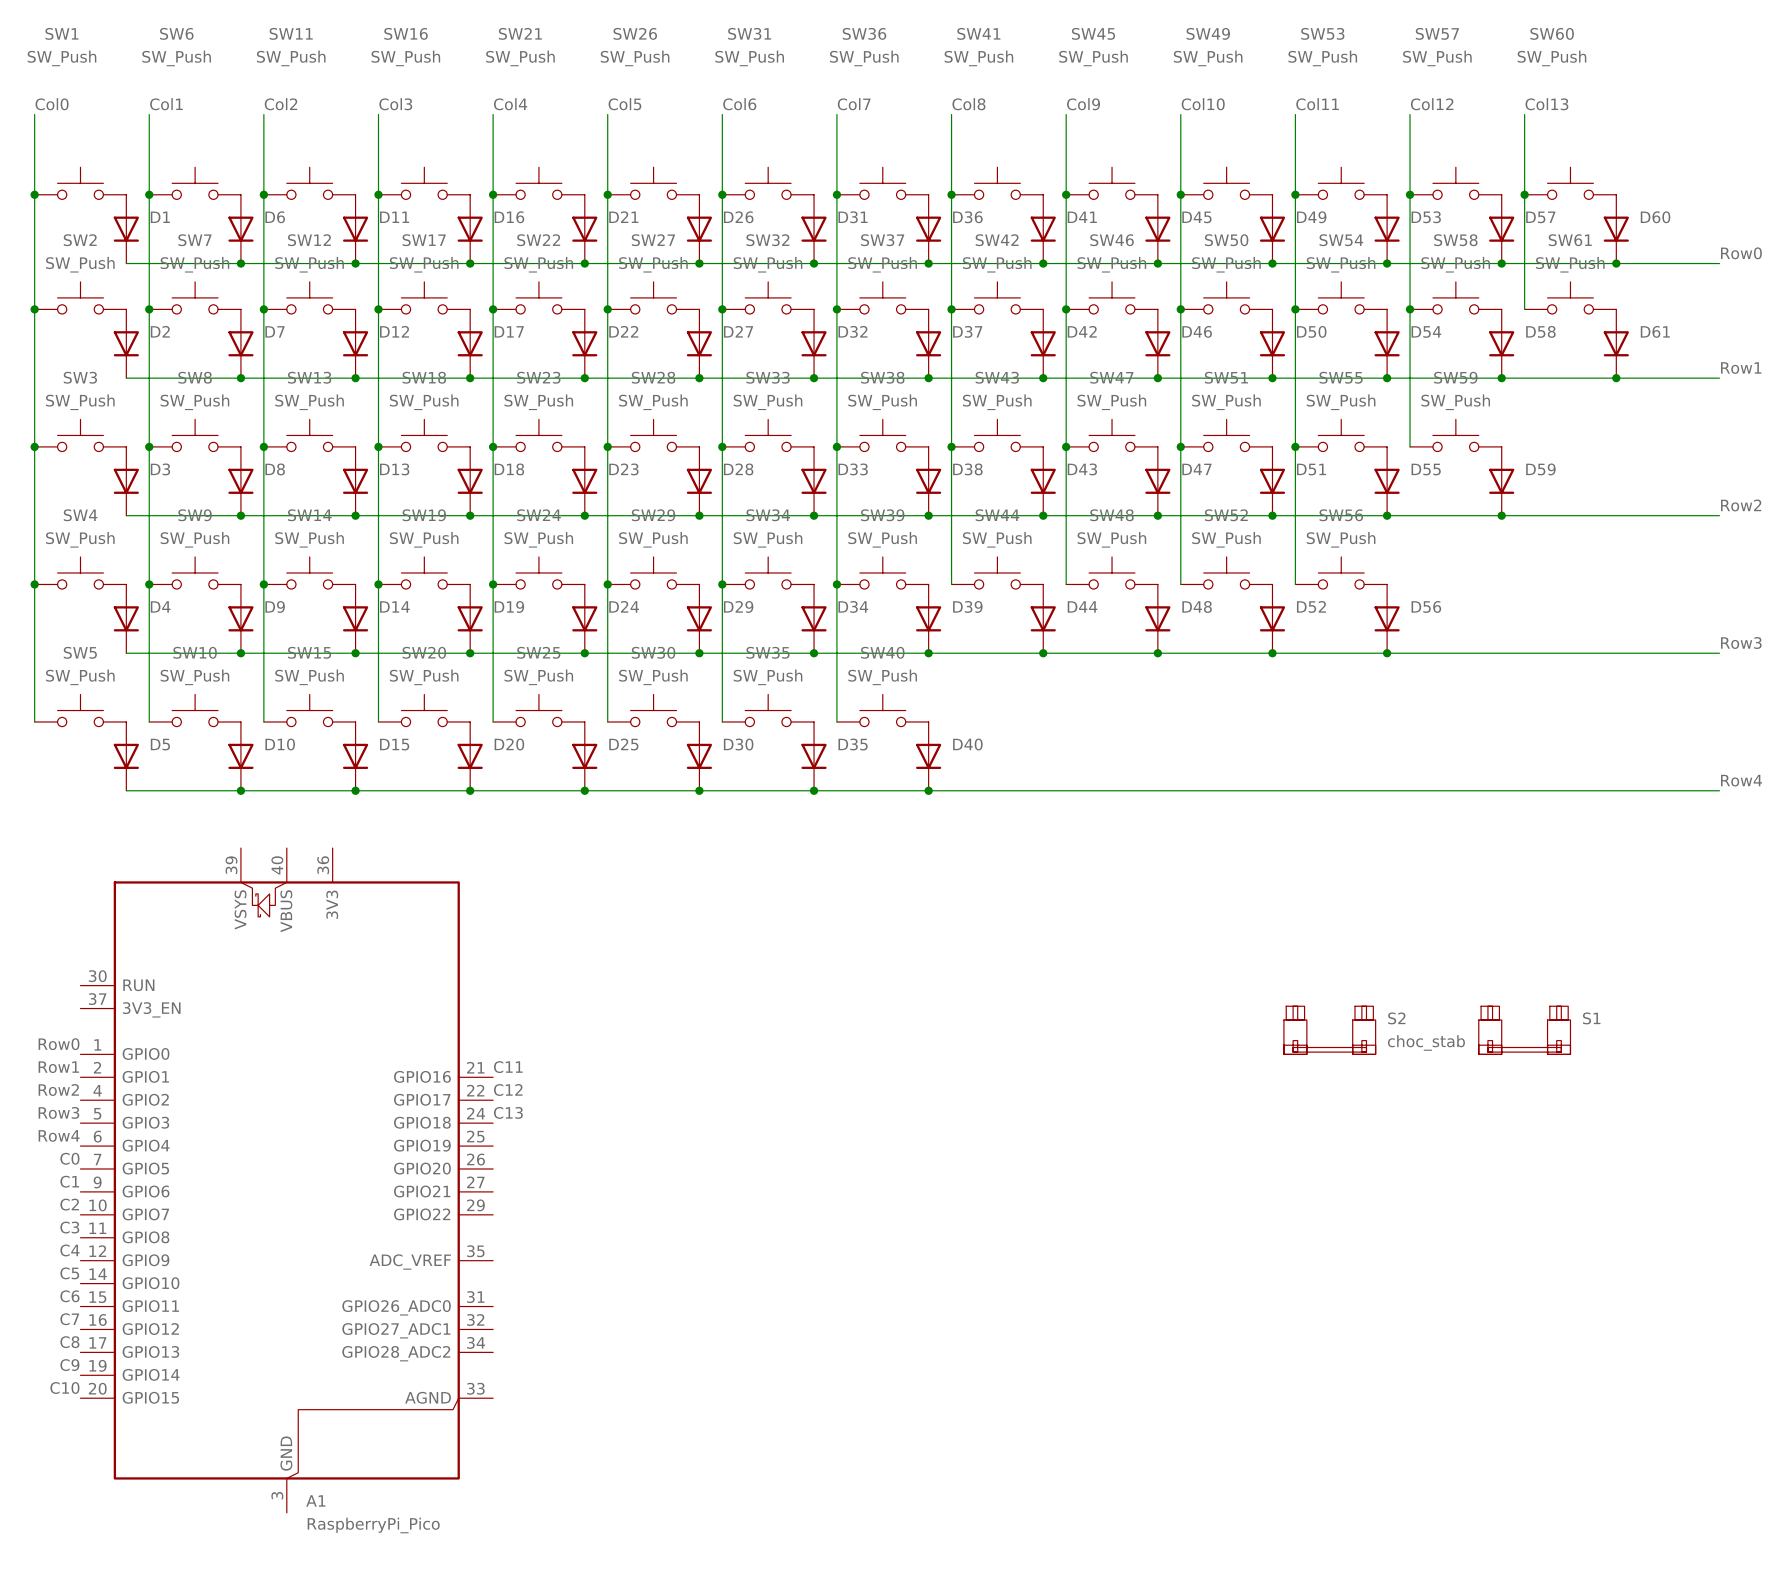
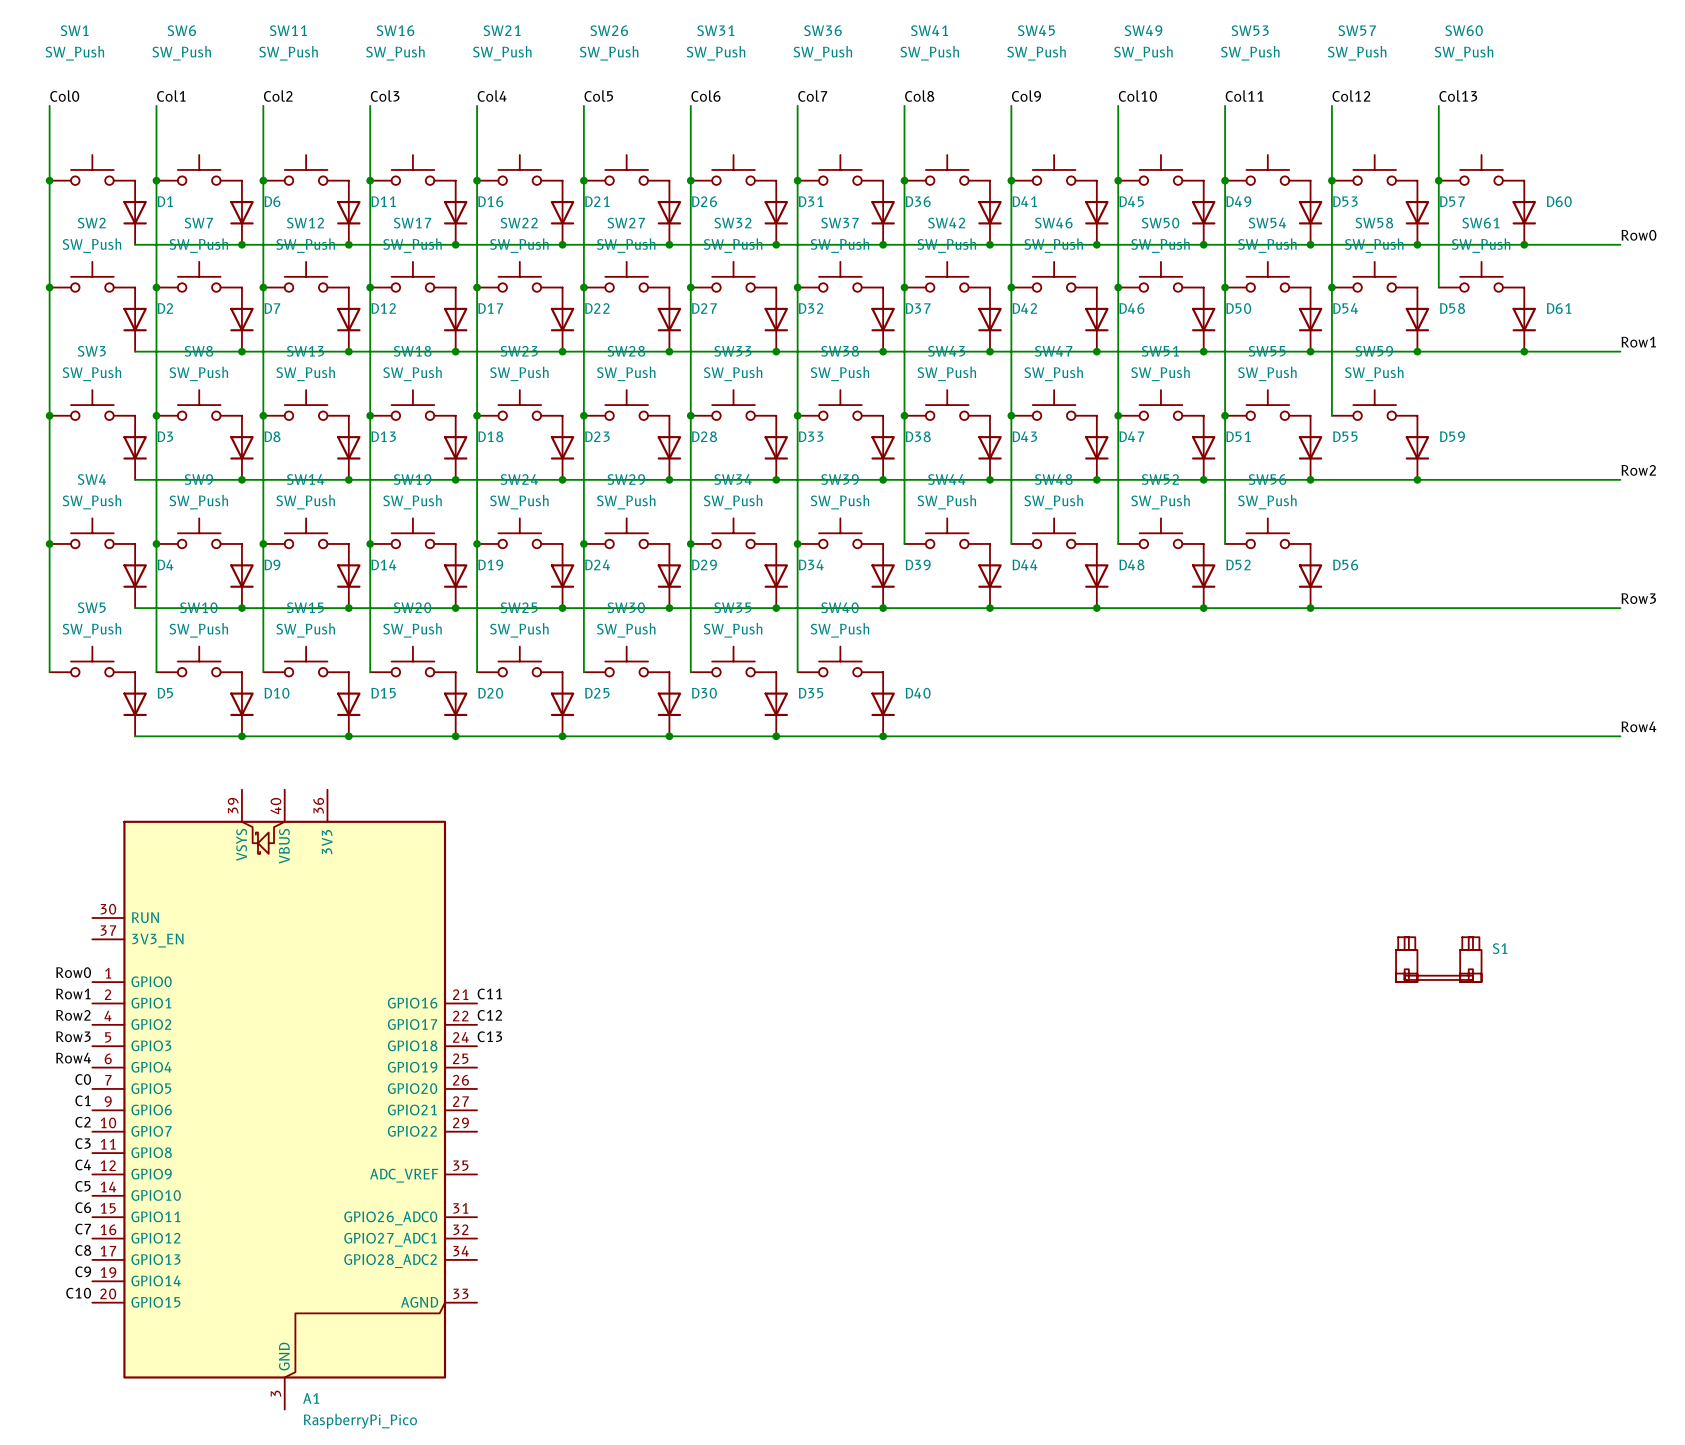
S2: choc_stab (1329, 1030) -> none

